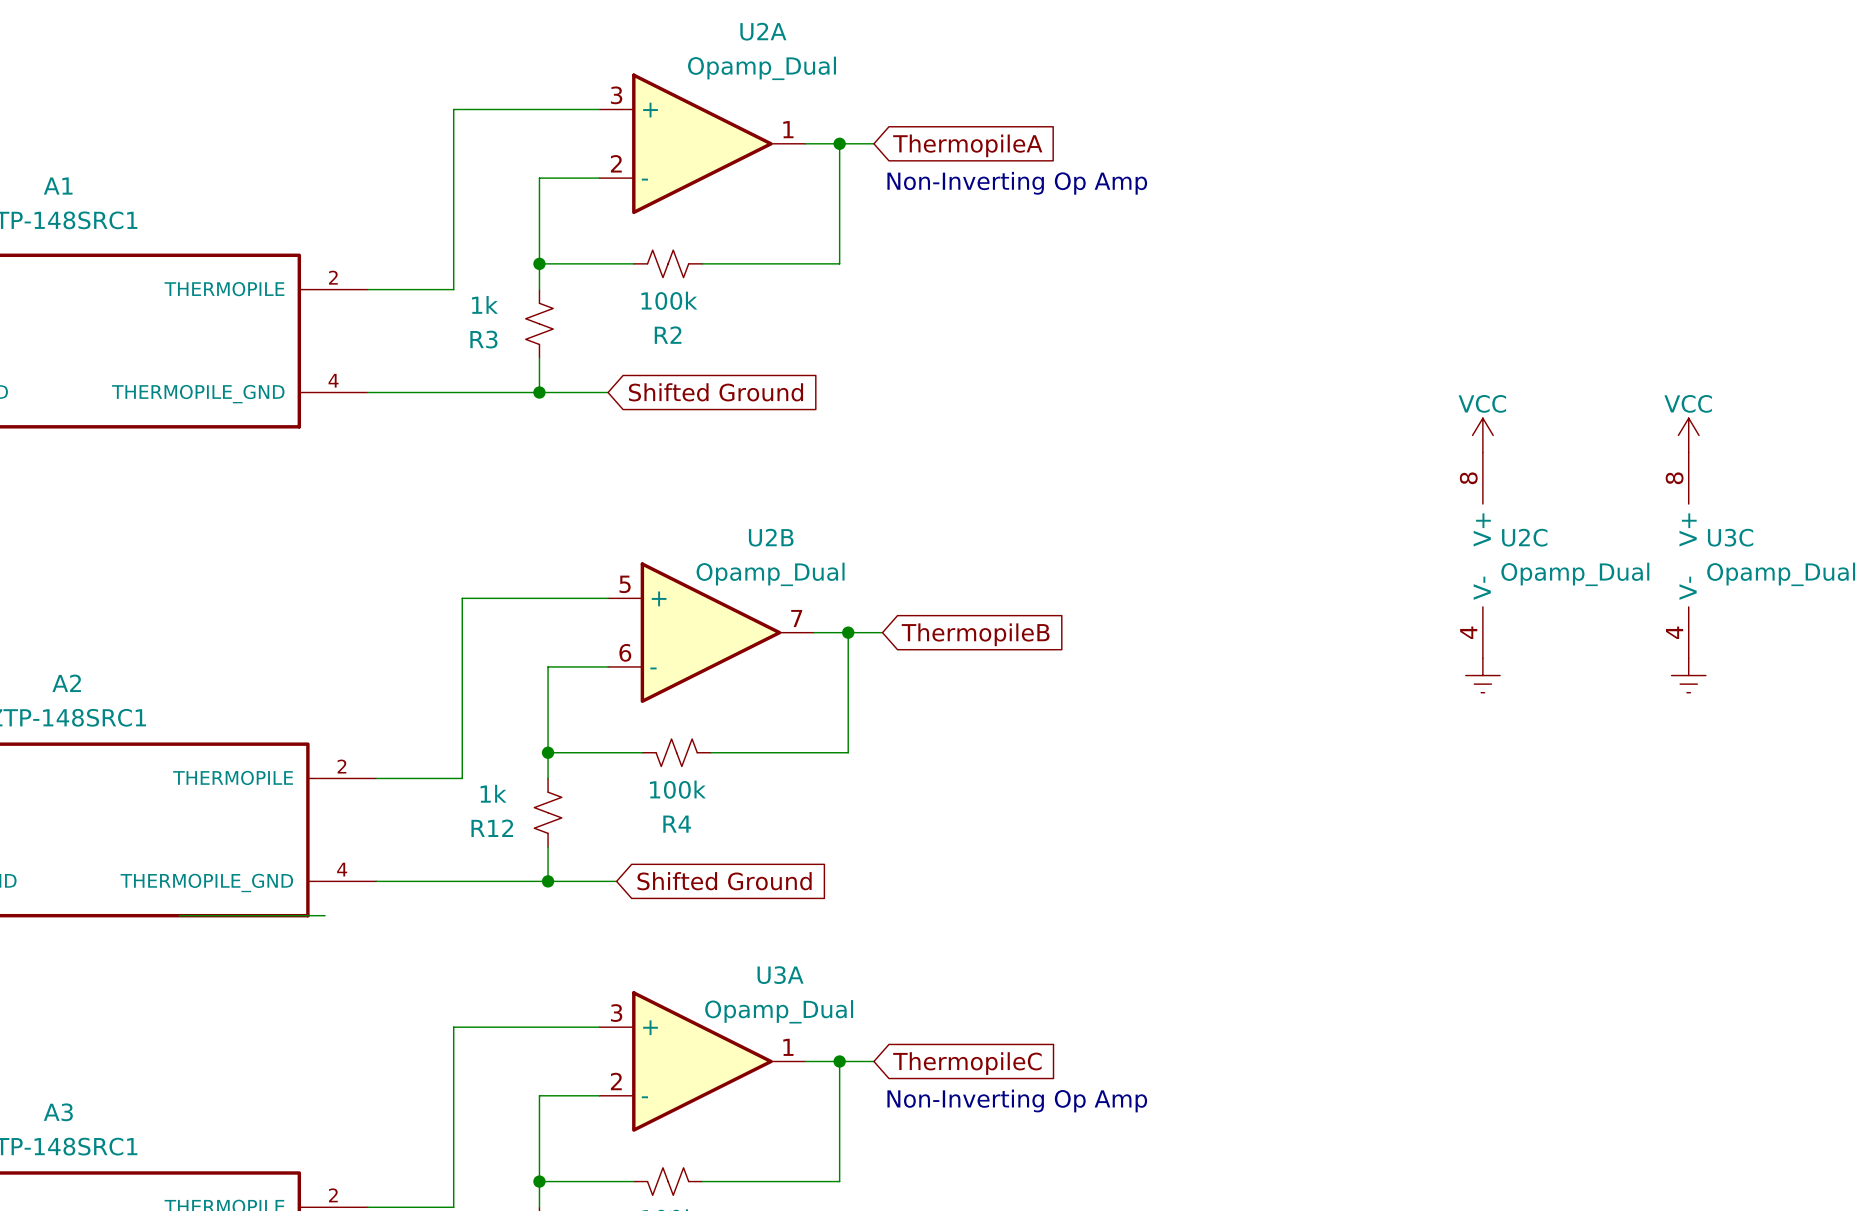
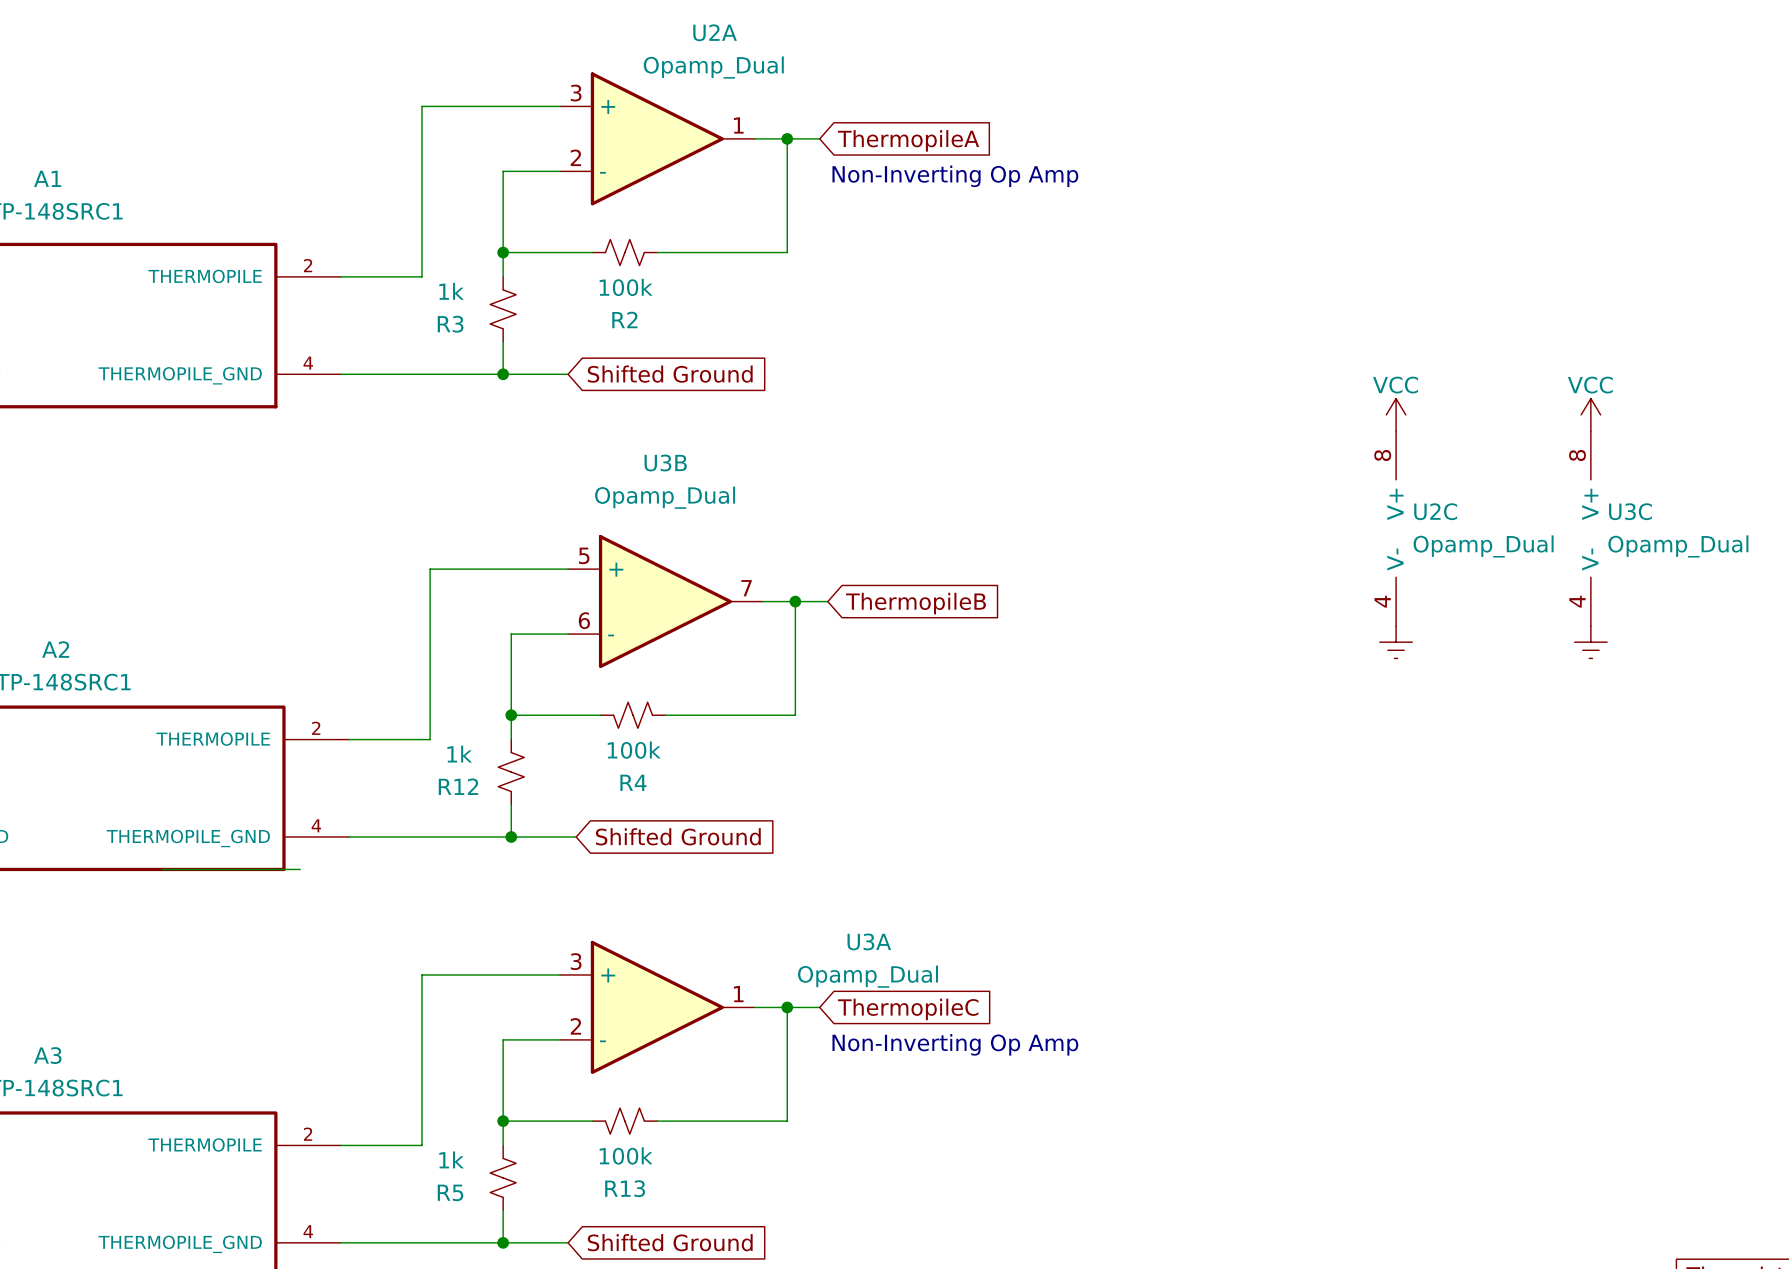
U2B name: U2B (771, 537) -> U3B (665, 463)
U2B value position: Opamp_Dual (770, 574) -> Opamp_Dual (665, 497)
U3A name position: U3A (780, 975) -> U3A (869, 941)
U3A value position: Opamp_Dual (779, 1011) -> Opamp_Dual (868, 976)

